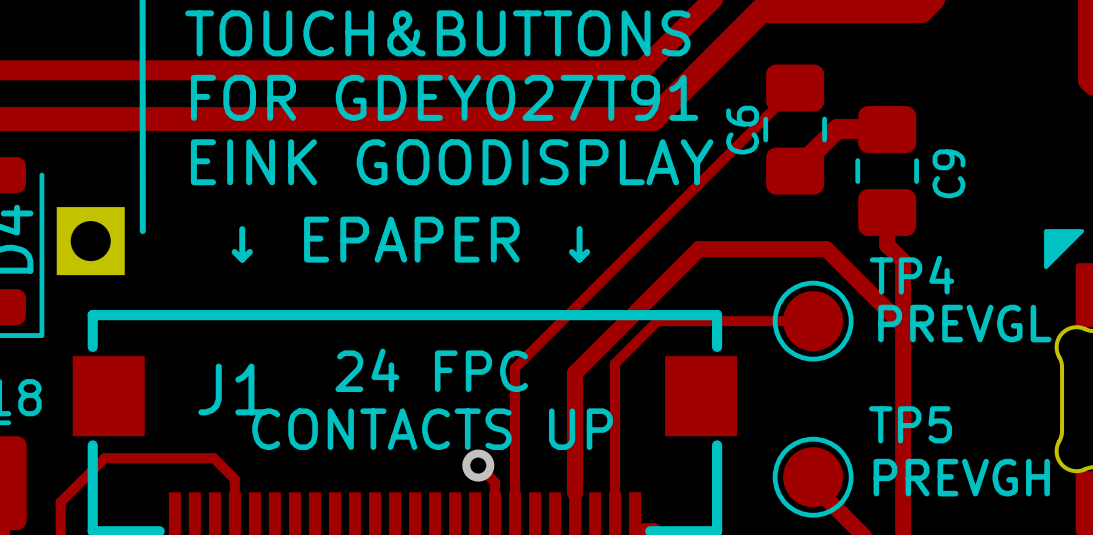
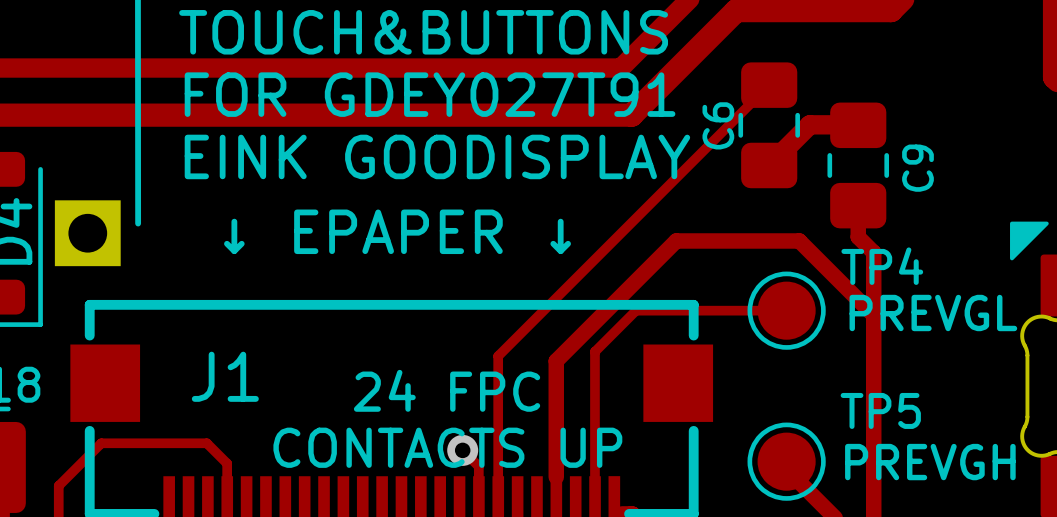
text position: 24 FPC (431, 370) -> 24 FPC (447, 390)
text position: CONTACTS UP (432, 429) -> CONTACTS UP (447, 447)

